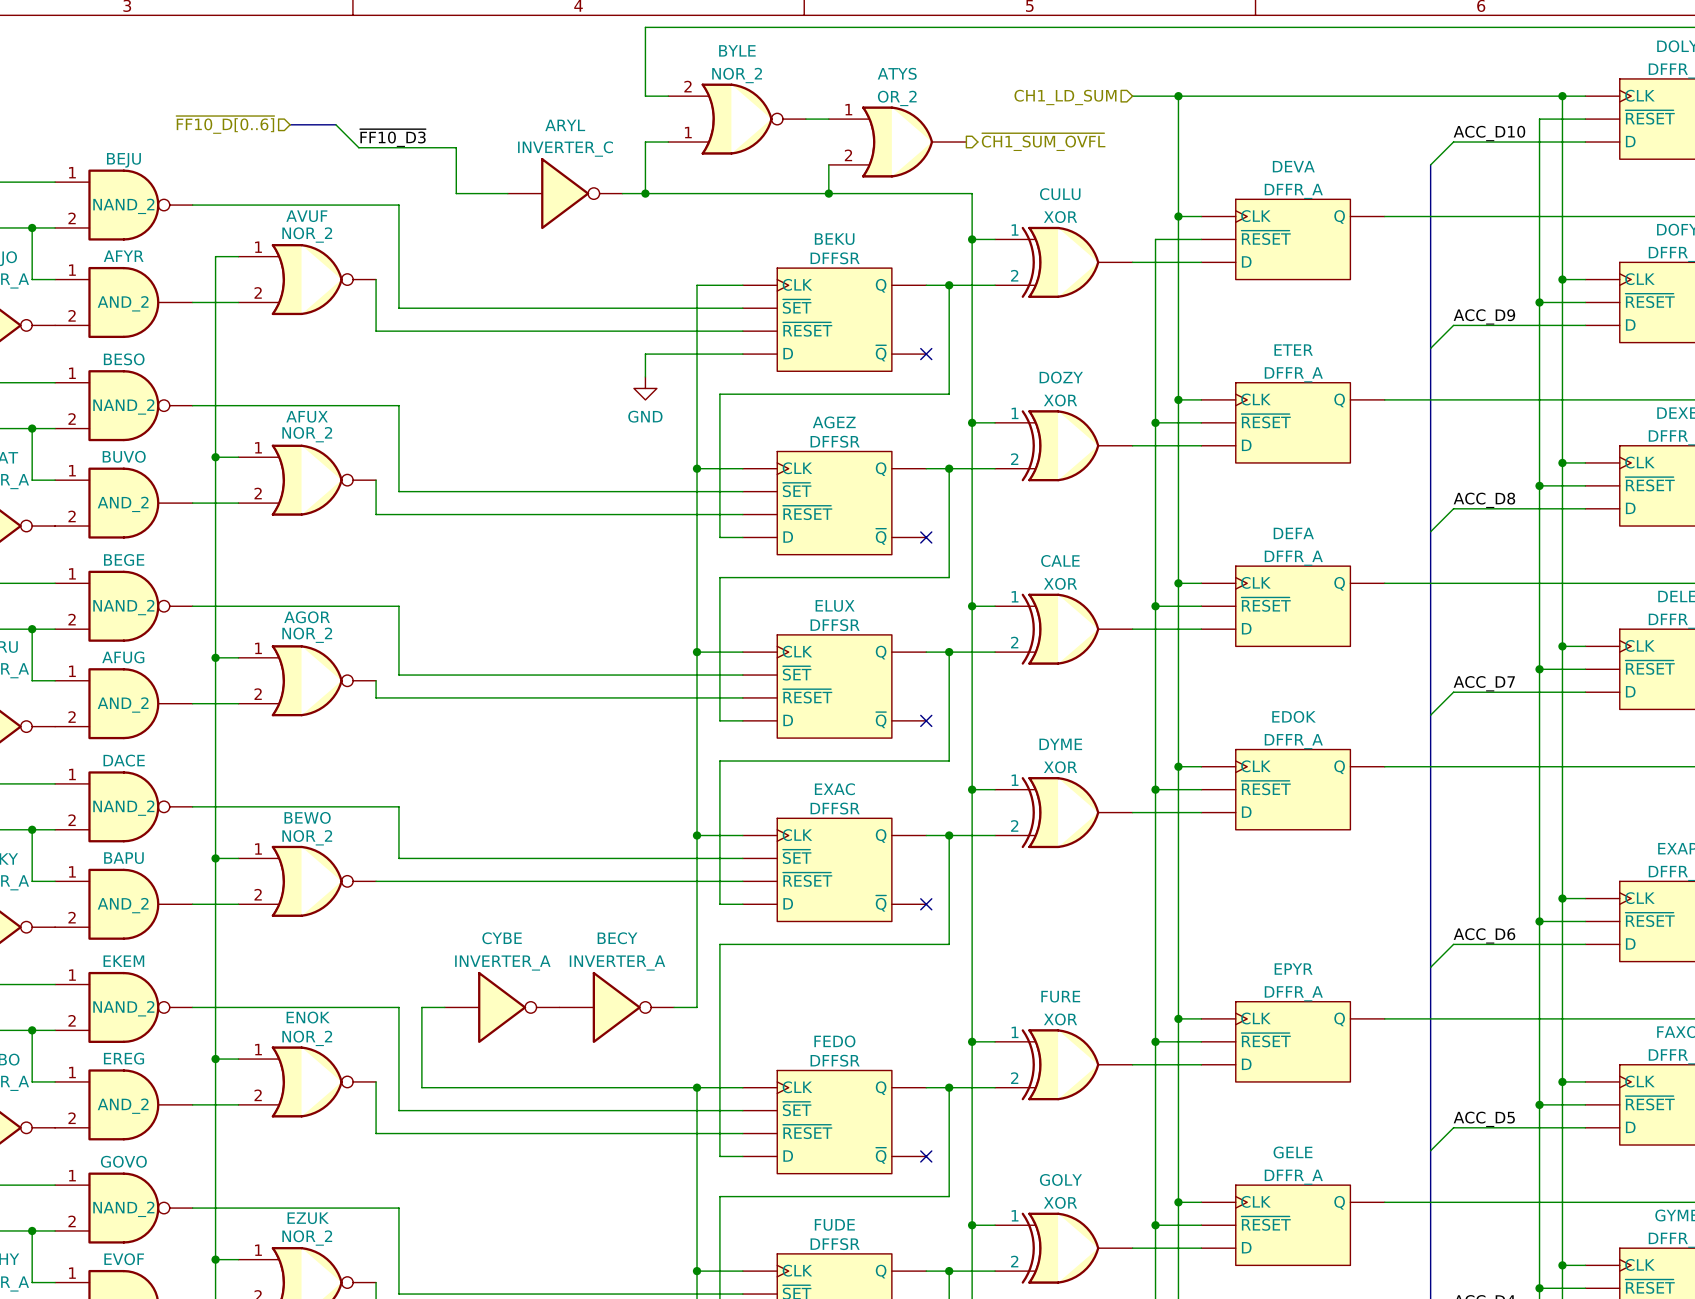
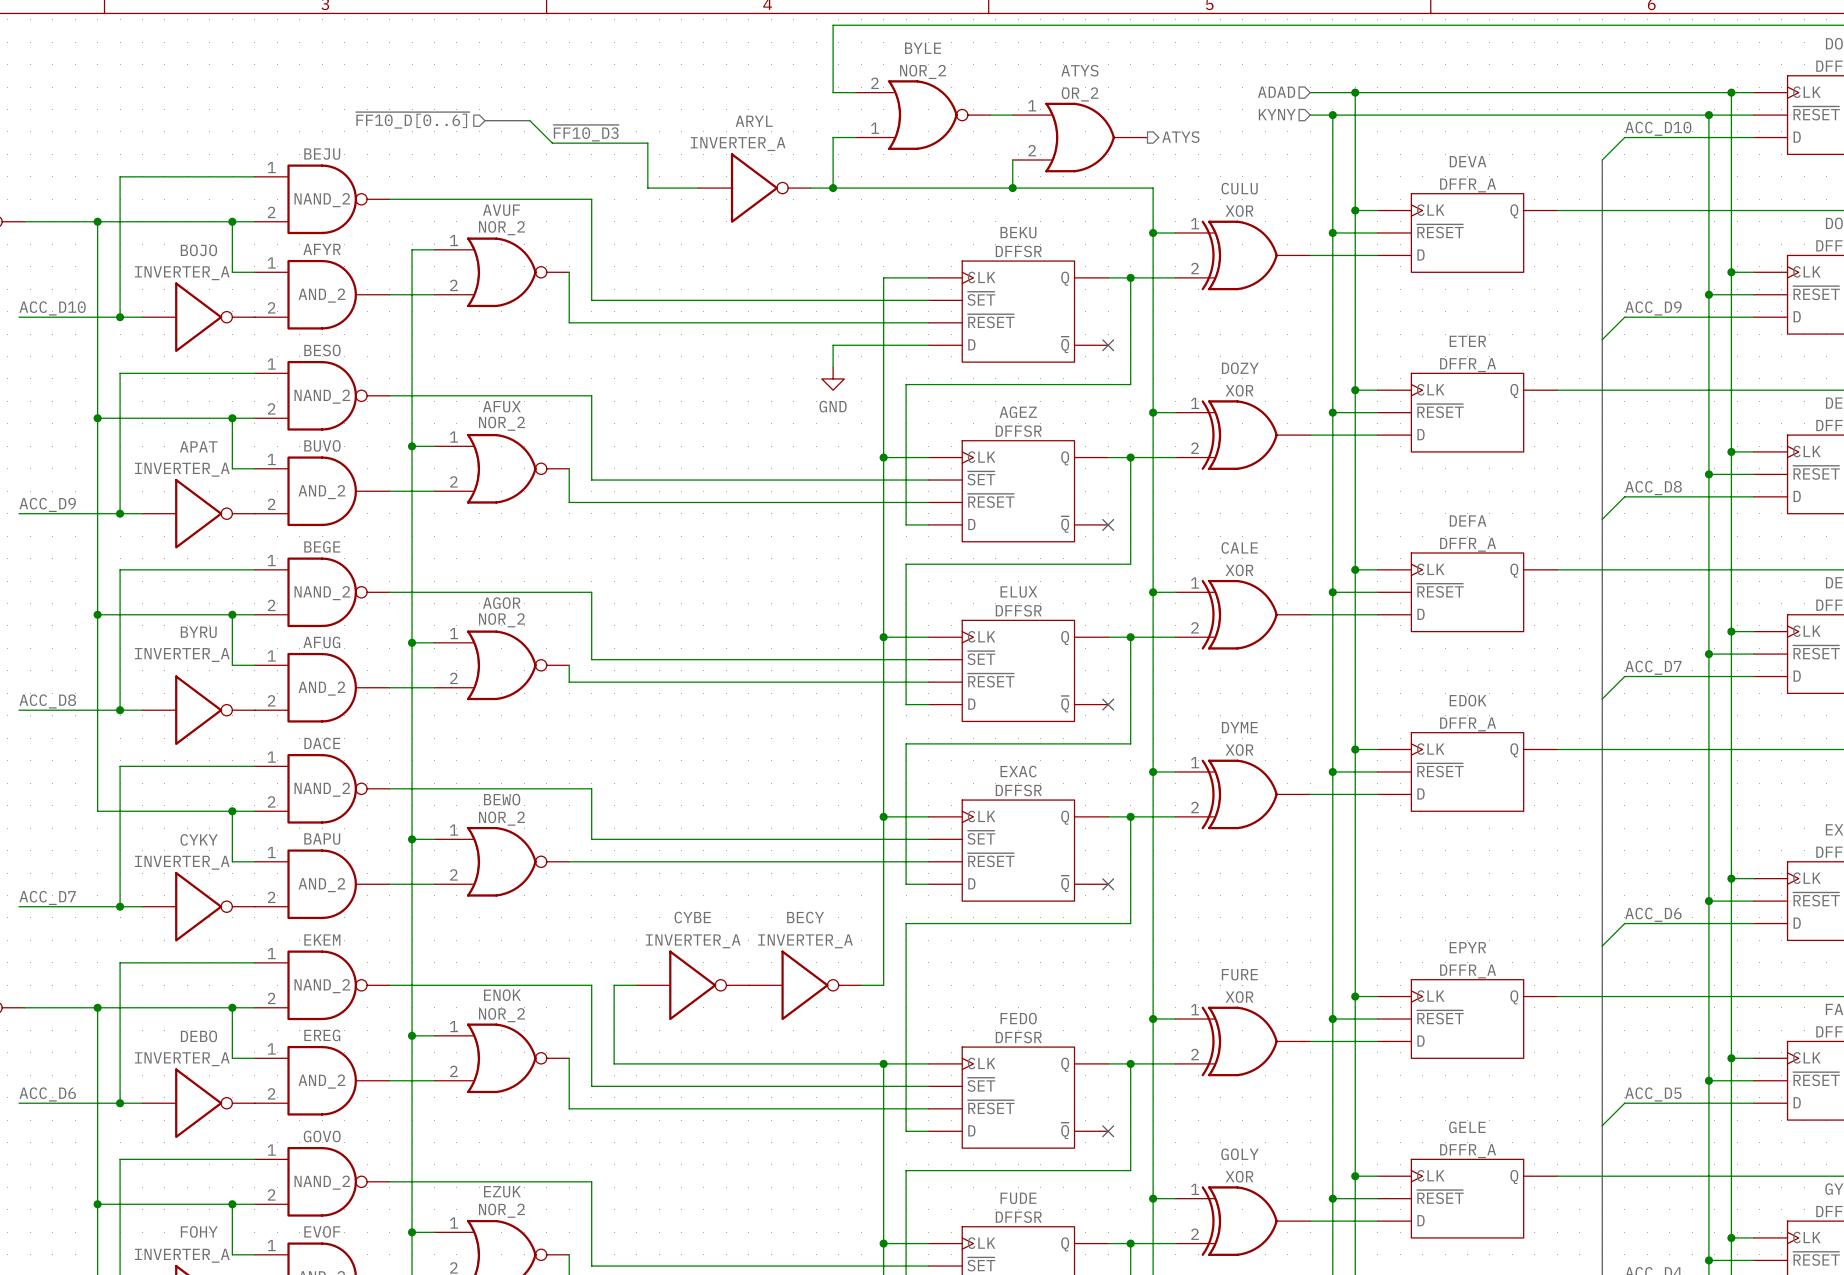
hierarchical label: CH1_LD_SUM (1065, 97) -> ADAD (1276, 92)
hierarchical label: none -> KYNY (1277, 114)
wire: none -> (1310, 115) (1708, 115)
wire: none -> (1332, 115) (1332, 232)
junction: none -> (1332, 115)
junction: none -> (1708, 115)
hierarchical label: ~{CH1_SUM_OVFL} (1043, 142) -> ATYS (1180, 137)
ARYL value: INVERTER_C (565, 149) -> INVERTER_A (738, 144)
junction: none -> (1332, 232)

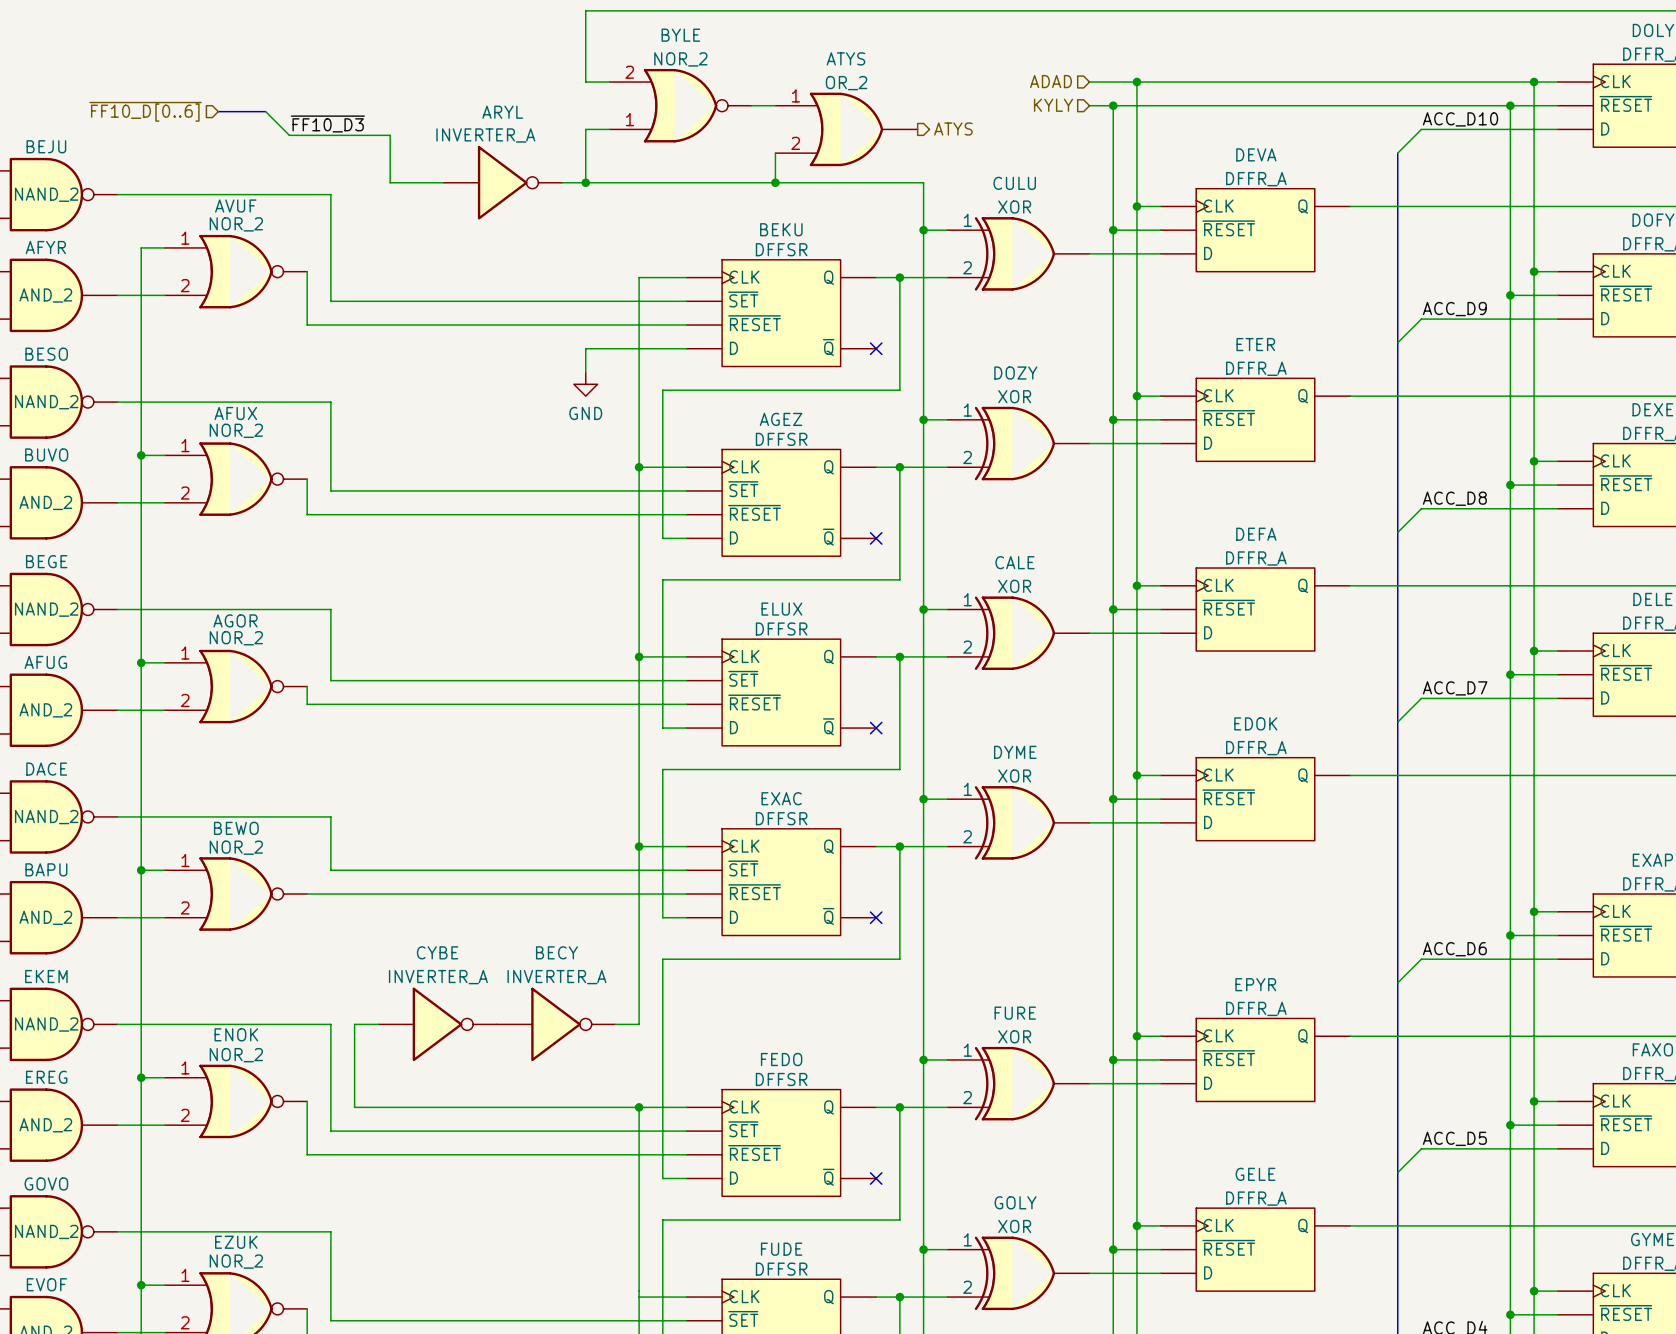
hierarchical label: KYNY (1277, 114) -> KYLY (1053, 105)
junction: (883, 1243) -> none

